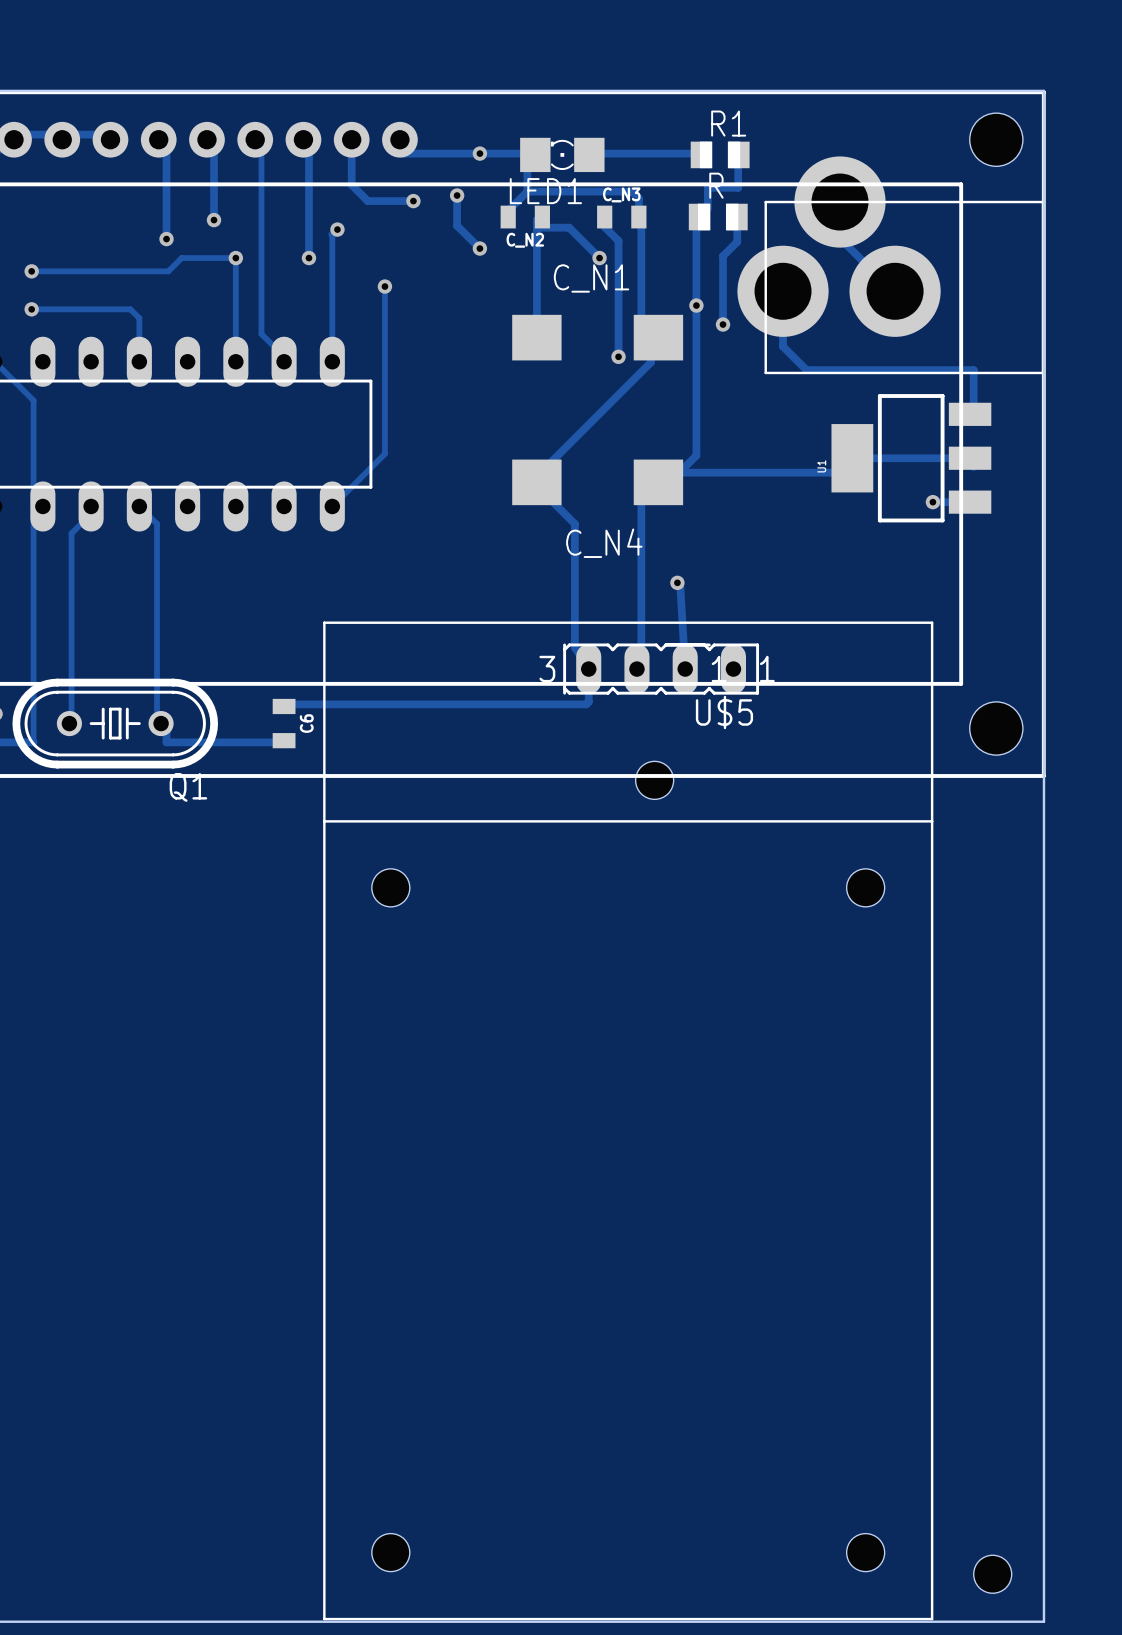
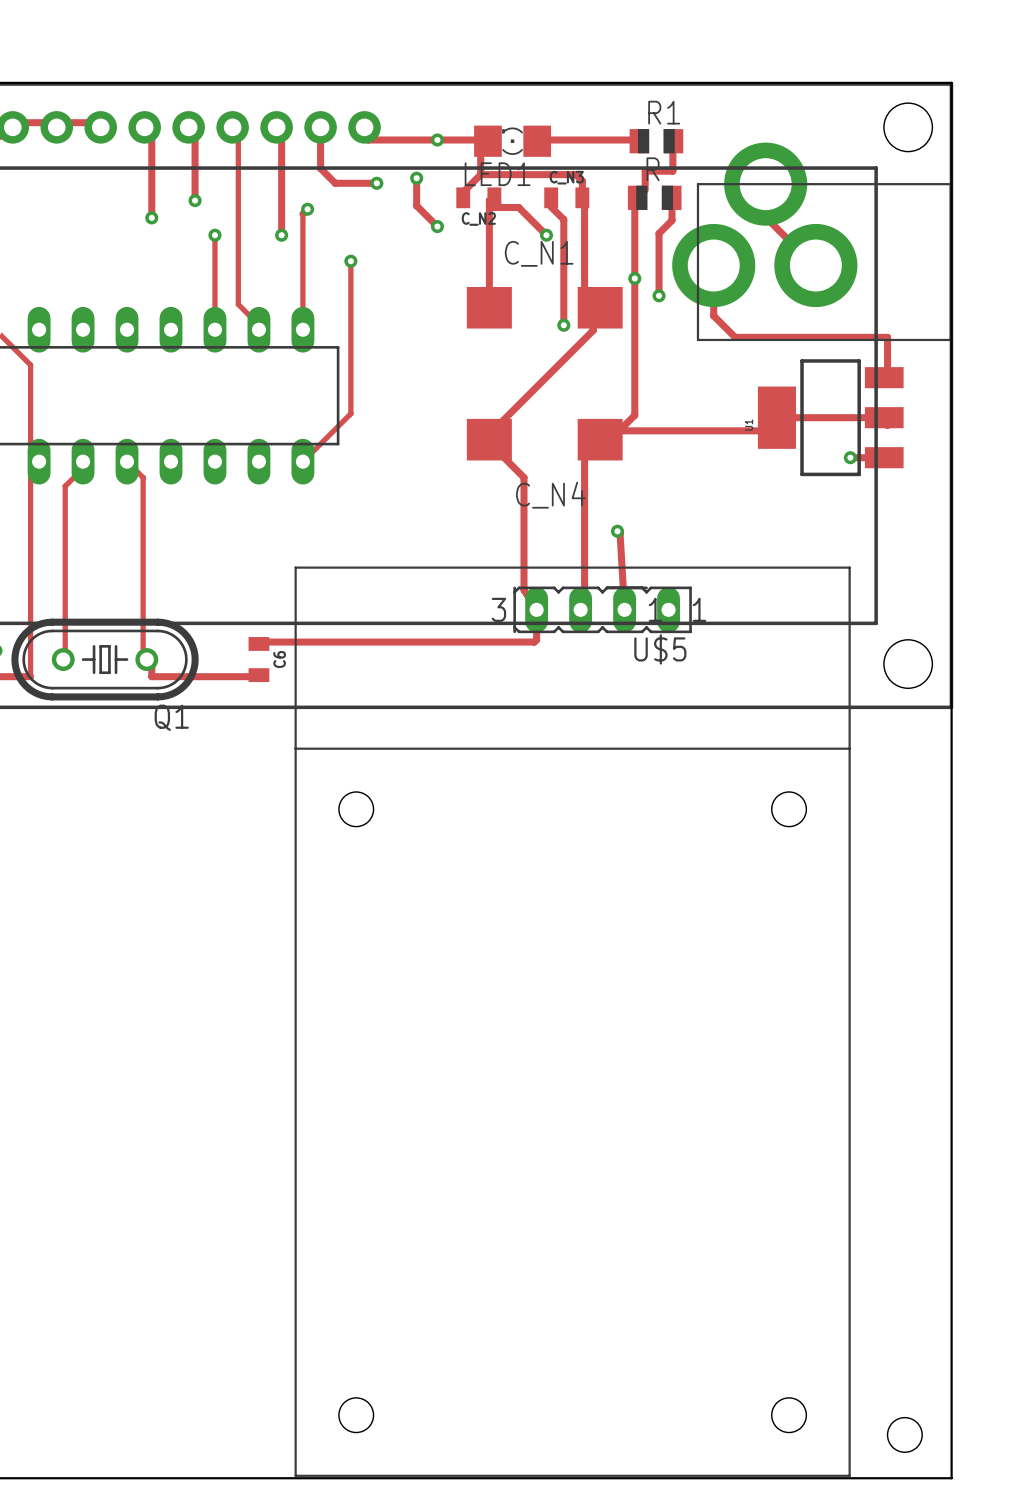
track: (235, 258) (181, 258) (168, 271) (31, 271) -> none
via: (31, 271) -> none
track: (31, 309) (130, 309) (139, 318) (139, 361) -> none
via: (31, 309) -> none
hole: (654, 780) -> none

